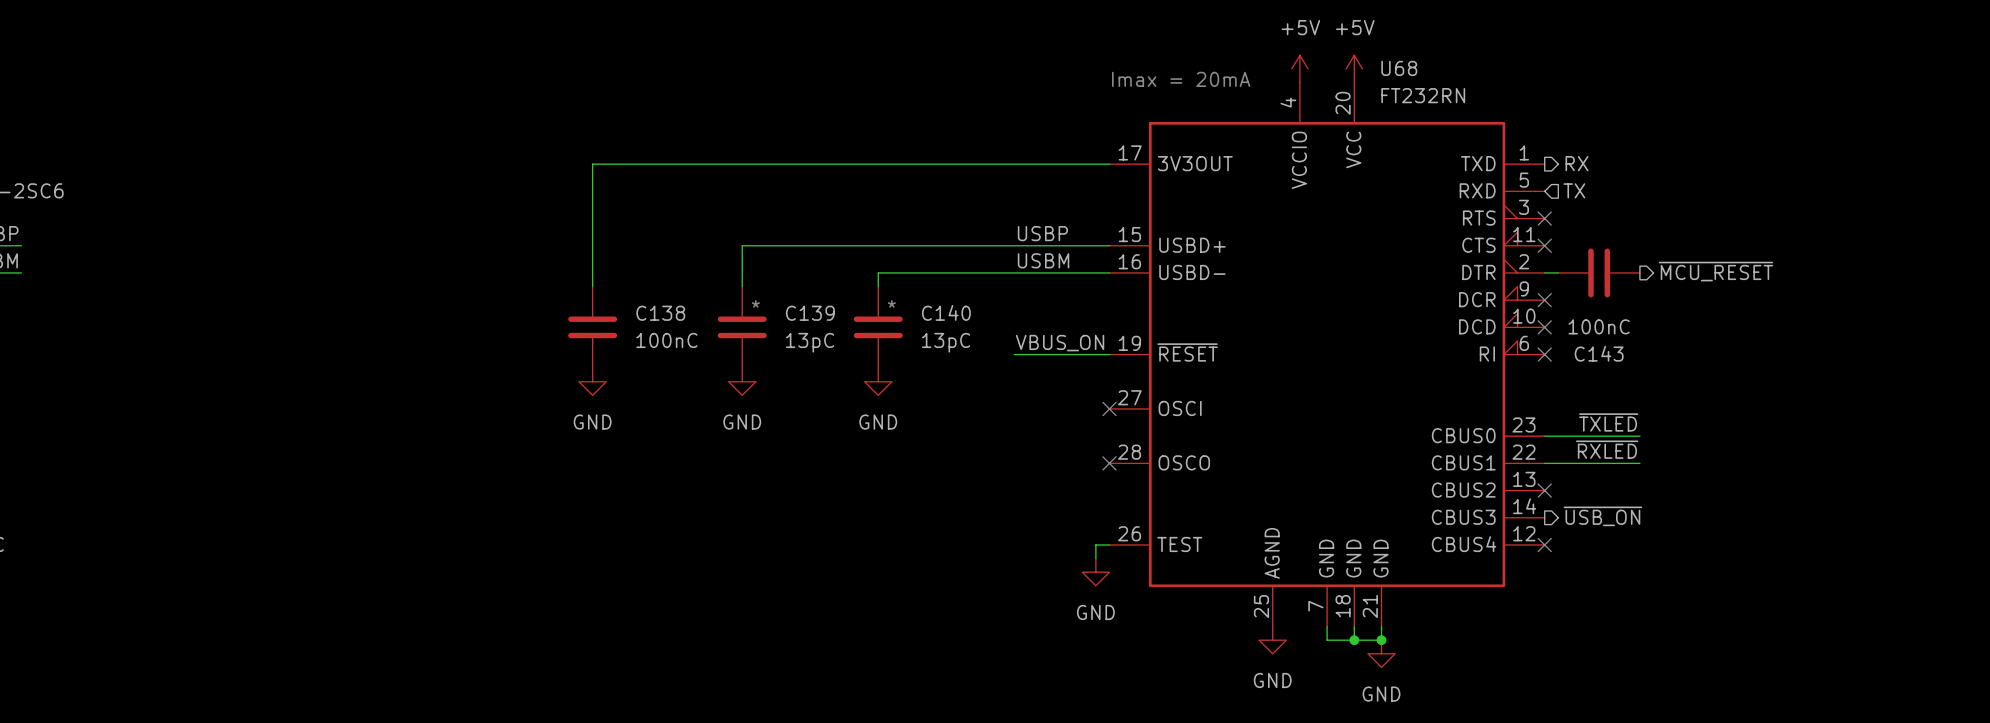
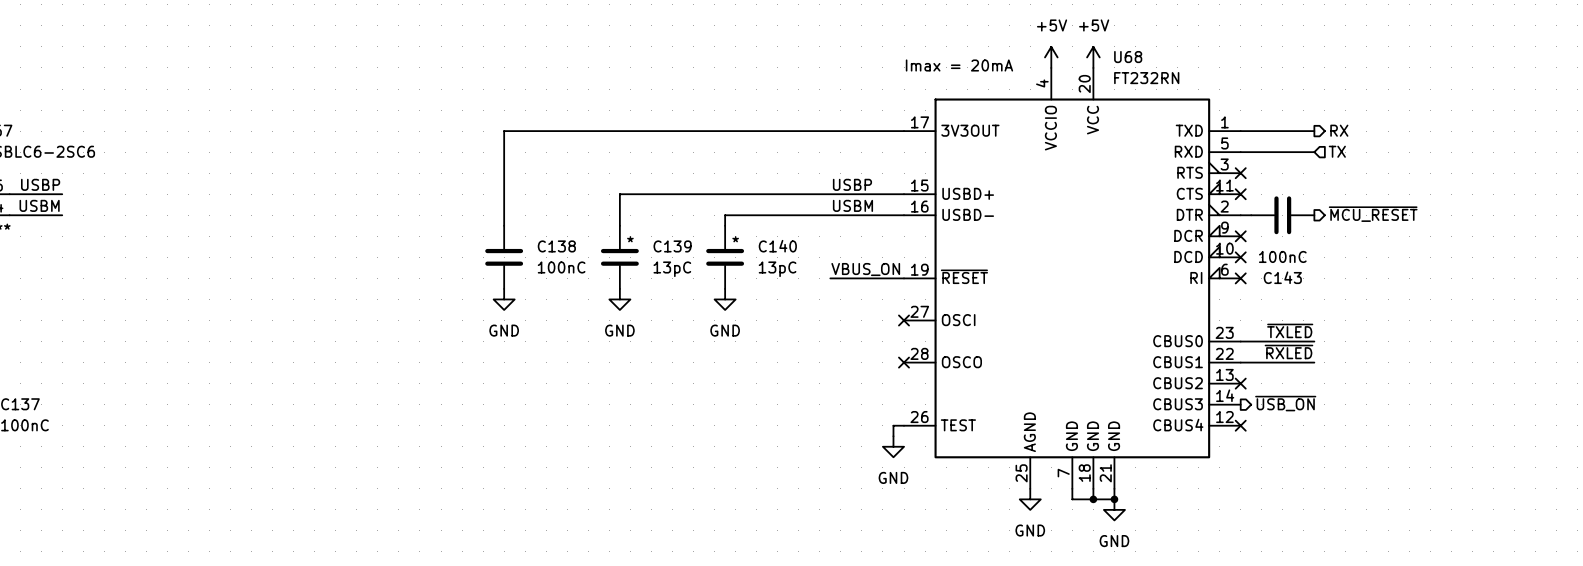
hierarchical label position: RX (1576, 163) -> RX (1339, 130)
wire: none -> (1240, 131) (1314, 131)
hierarchical label position: TX (1574, 190) -> TX (1337, 151)
wire: none -> (1240, 152) (1314, 152)

